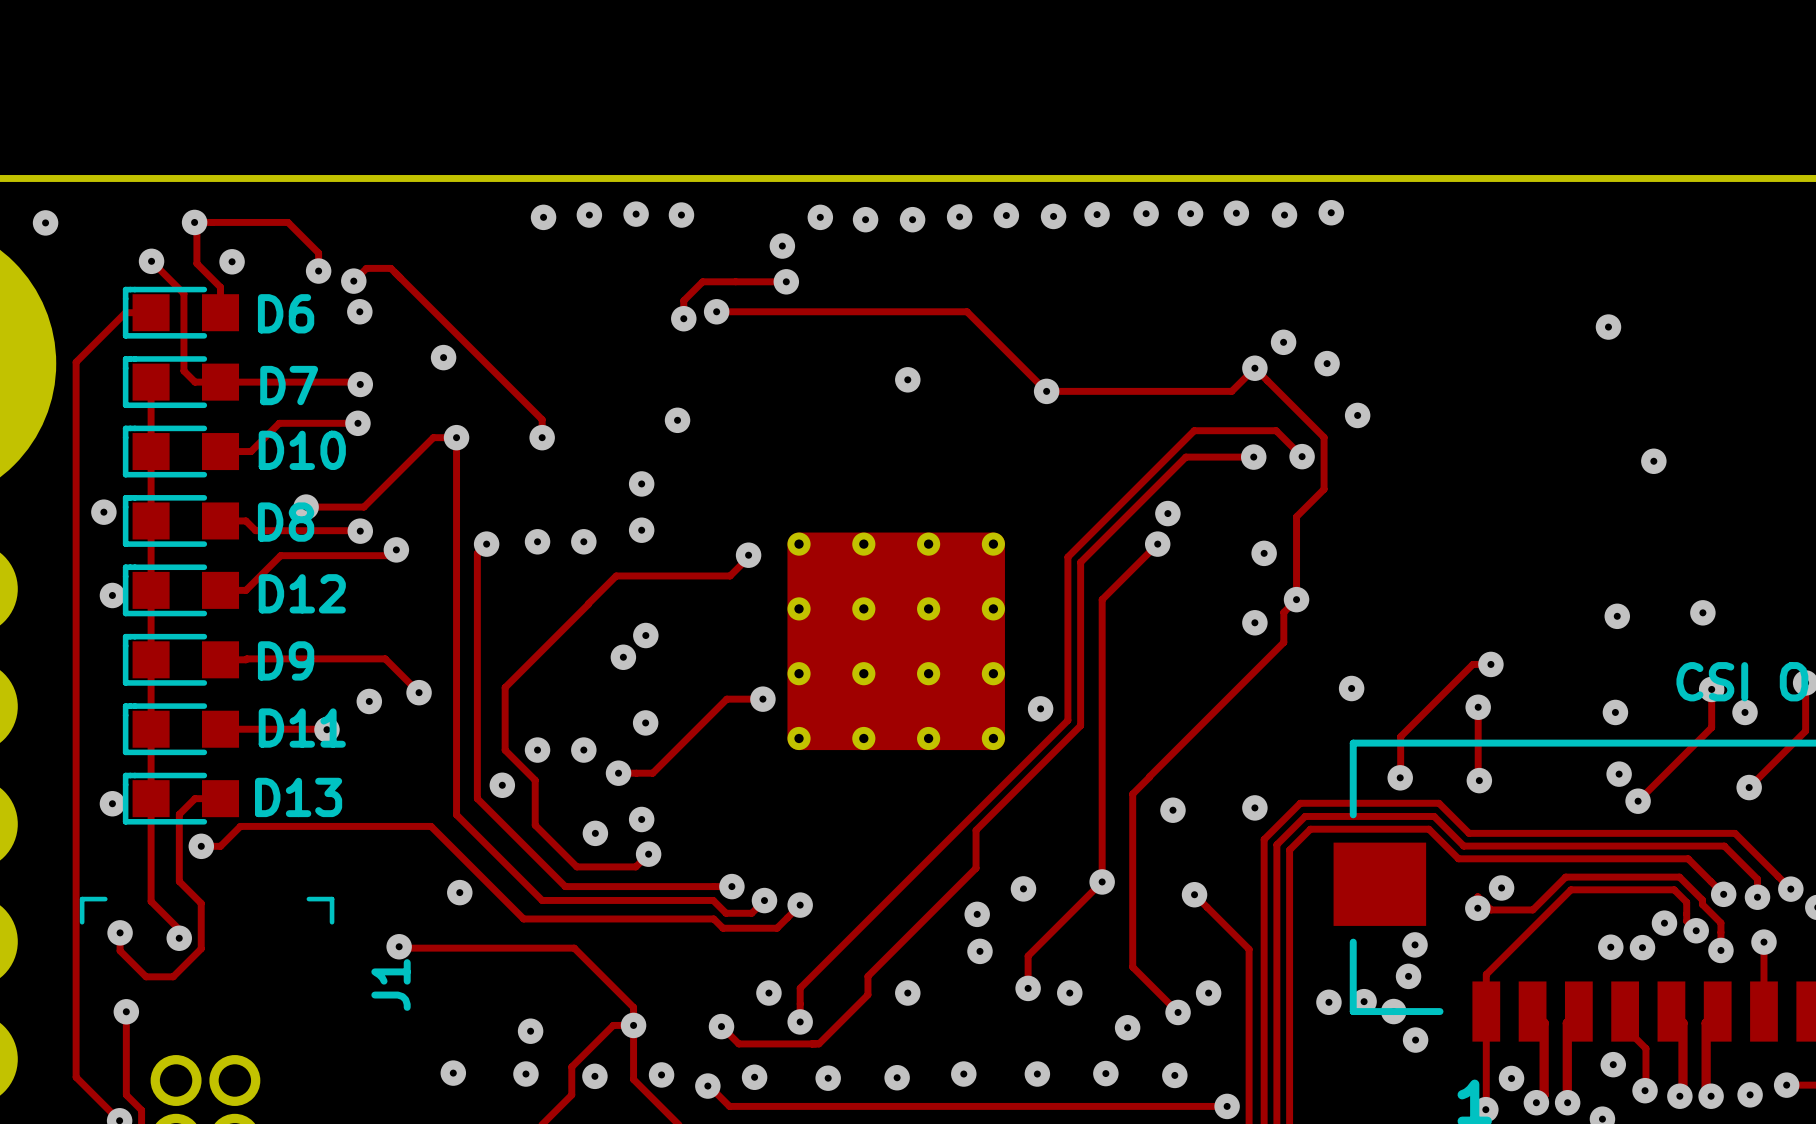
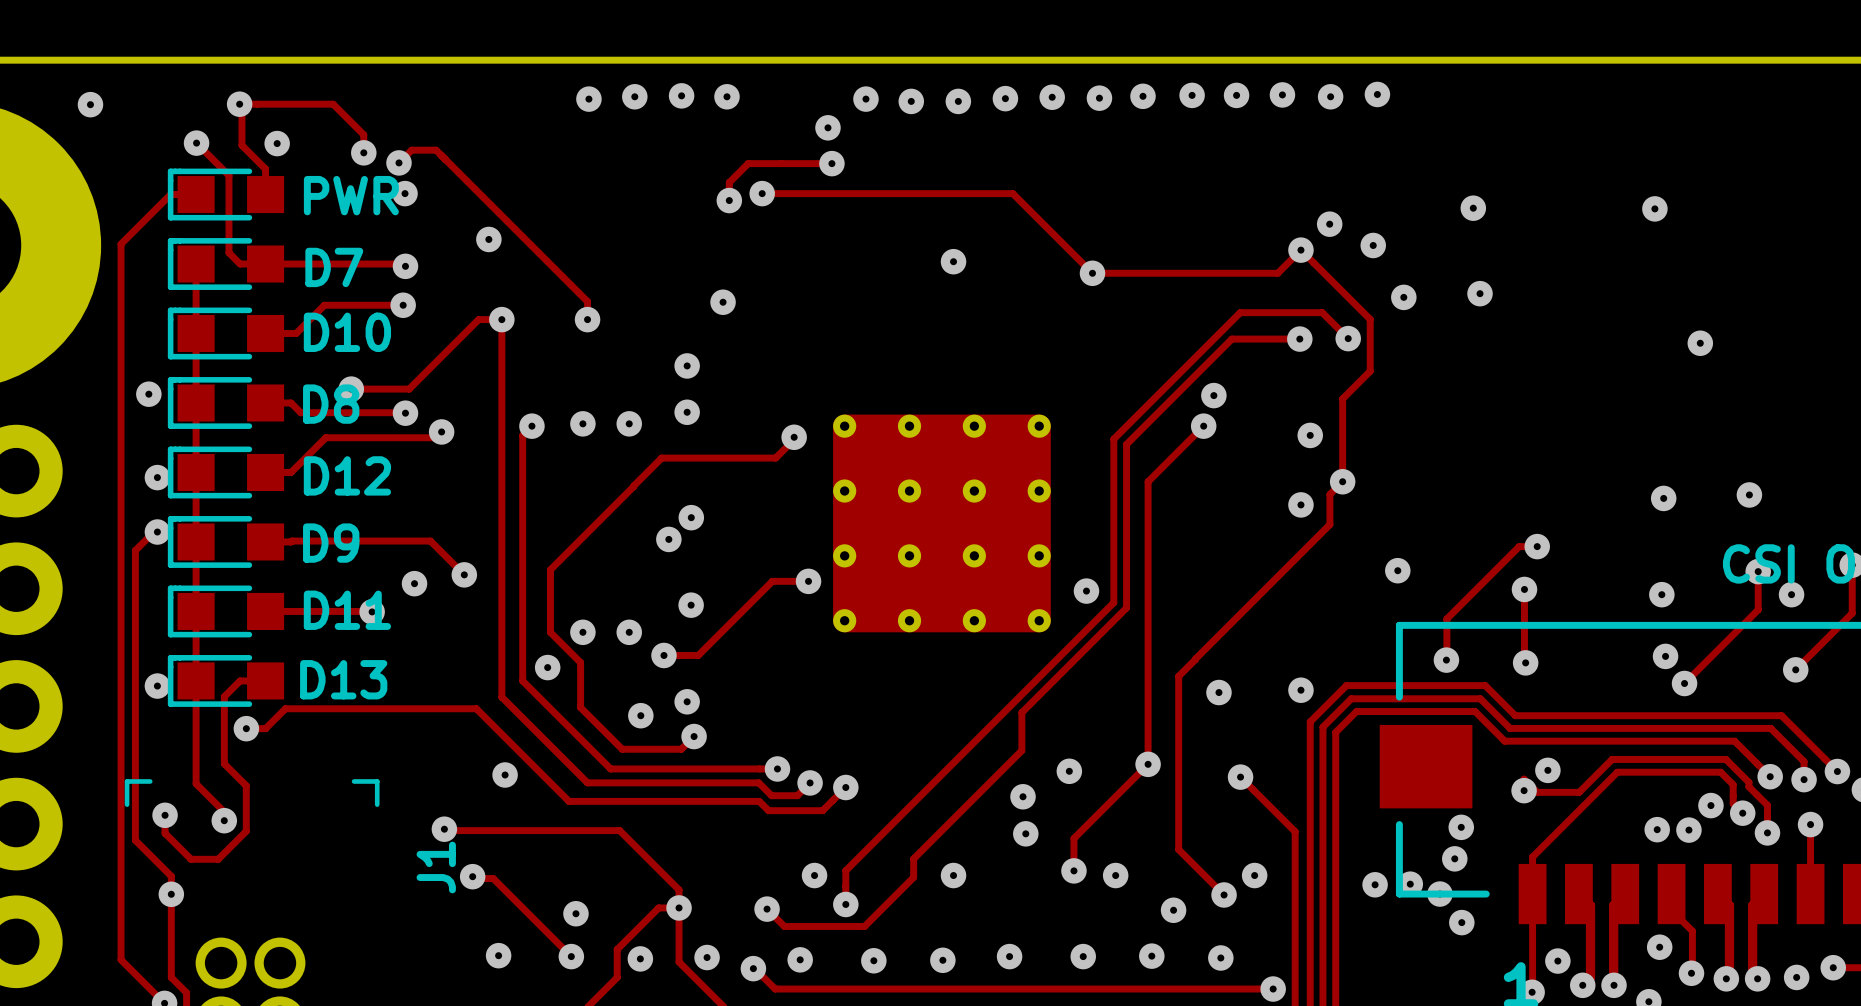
D6 name: D6 (286, 313) -> PWR (351, 195)
via: none -> (1473, 208)
via: none -> (1480, 293)
track: none -> (157, 532) (153, 532) (135, 550) (135, 840) (171, 876) (171, 894)
via: none -> (157, 532)
track: none -> (472, 876) (474, 878) (493, 878) (571, 956)
via: none -> (472, 876)

